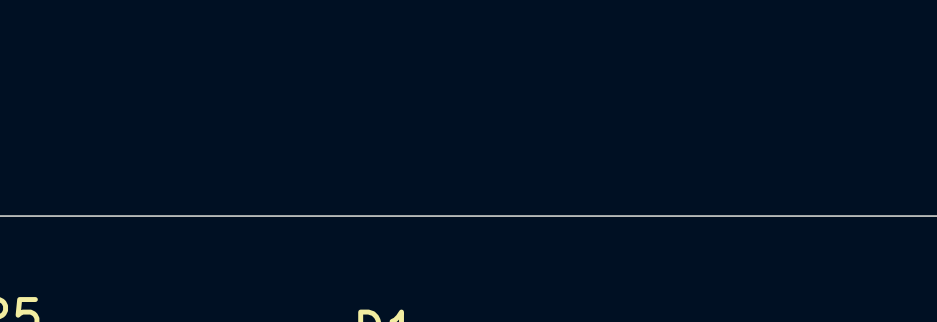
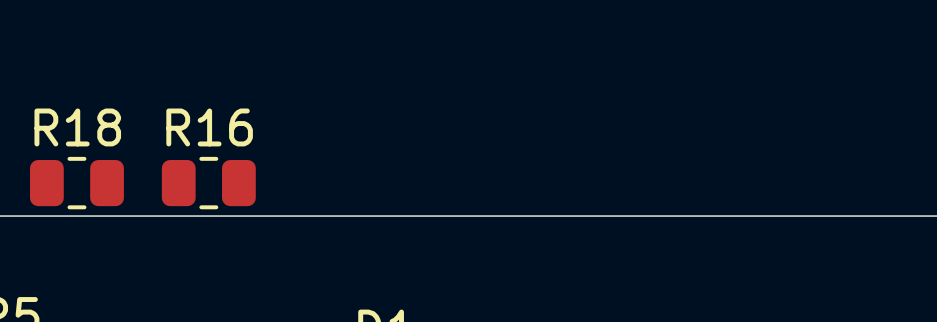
R18: none -> (76, 183)
R16: none -> (208, 183)

